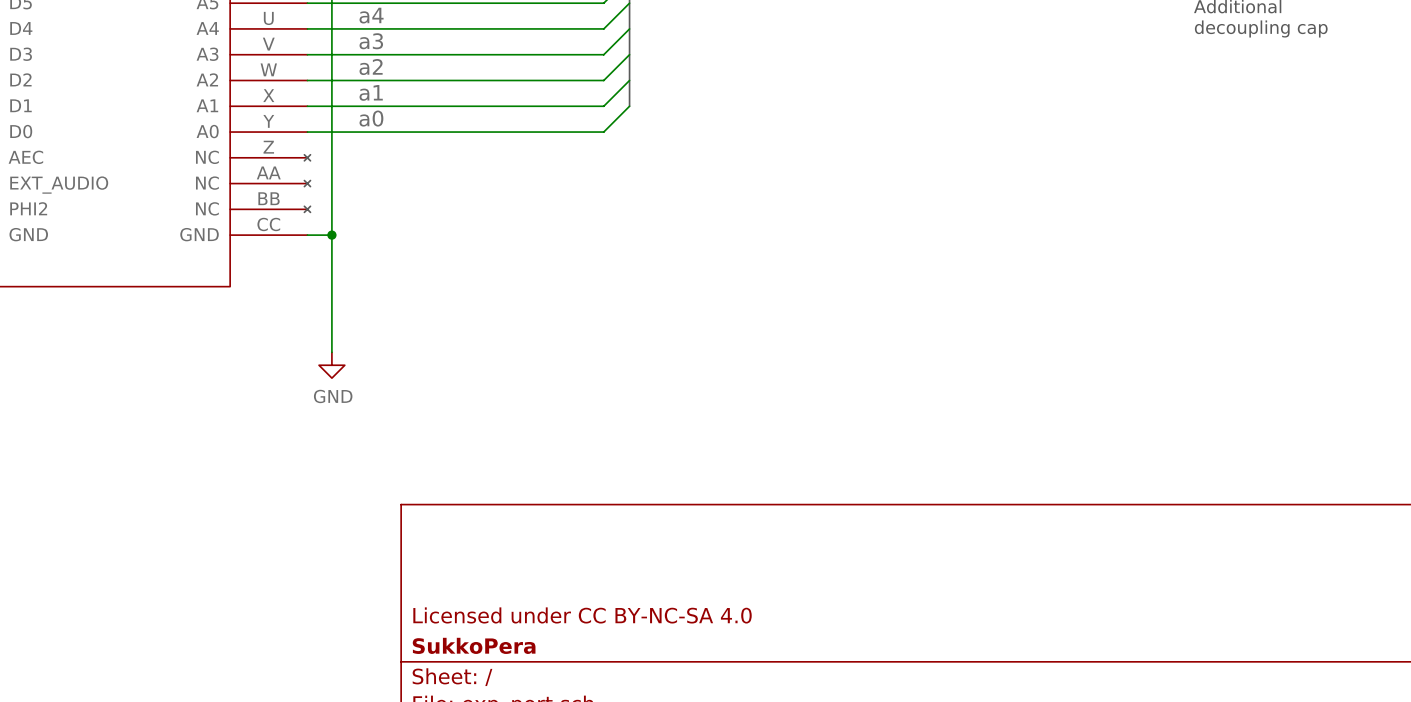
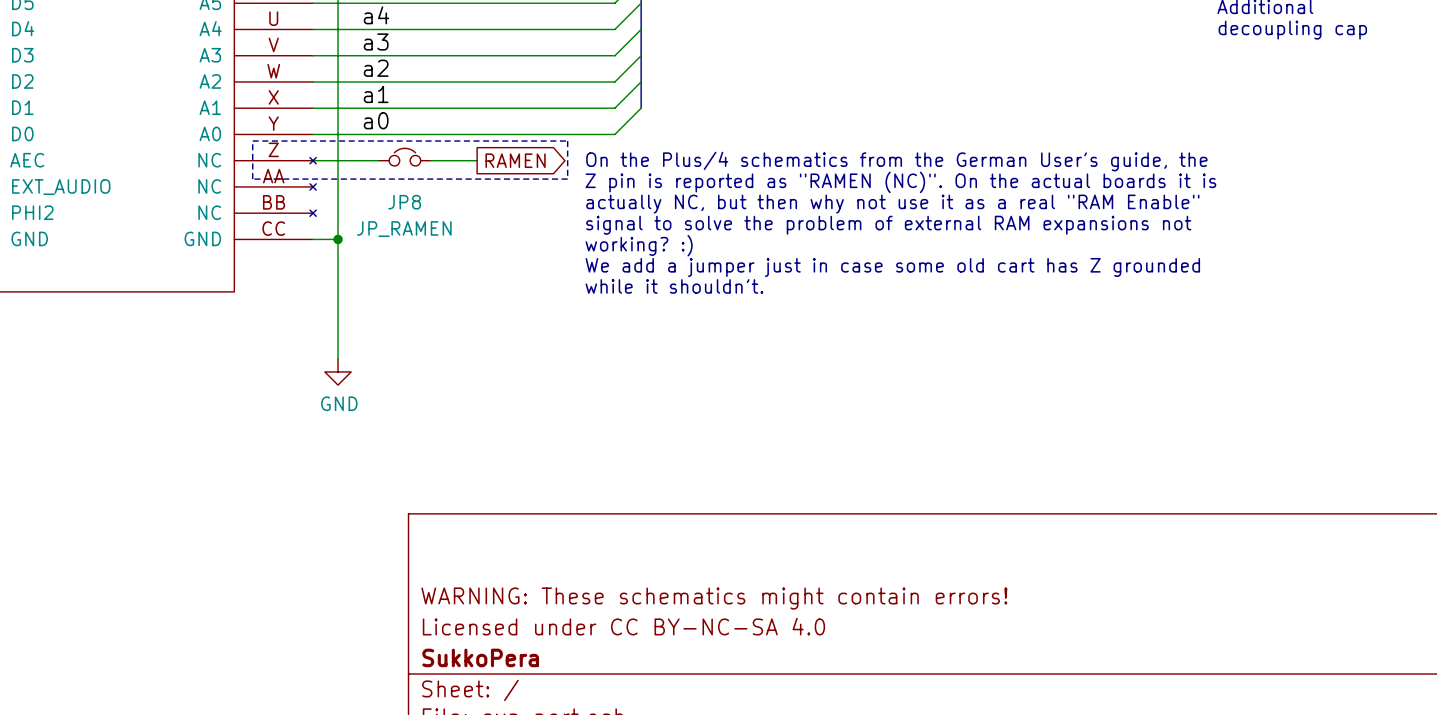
line: none -> (252, 141) (567, 141) (567, 179) (252, 179) (252, 141)
JP8: none -> JP_RAMEN (404, 157)
wire: none -> (313, 160) (378, 160)
wire: none -> (431, 160) (477, 160)
global label: none -> RAMEN (515, 160)
text: none -> On the Plus/4 schematics from the German User's guide, the (896, 161)
text: none -> Z pin is reported as "RAMEN (NC)". On the actual boards it is (900, 182)
text: none -> actually NC, but then why not use it as a real "RAM Enable" (892, 204)
text: none -> signal to solve the problem of external RAM expansions not (888, 225)
text: none -> working? :) (639, 245)
text: none -> We add a jumper just in case some old cart has Z grounded (892, 267)
text: none -> while it shouldn't. (674, 286)
title block: none -> WARNING: These schematics might contain errors! (714, 598)

